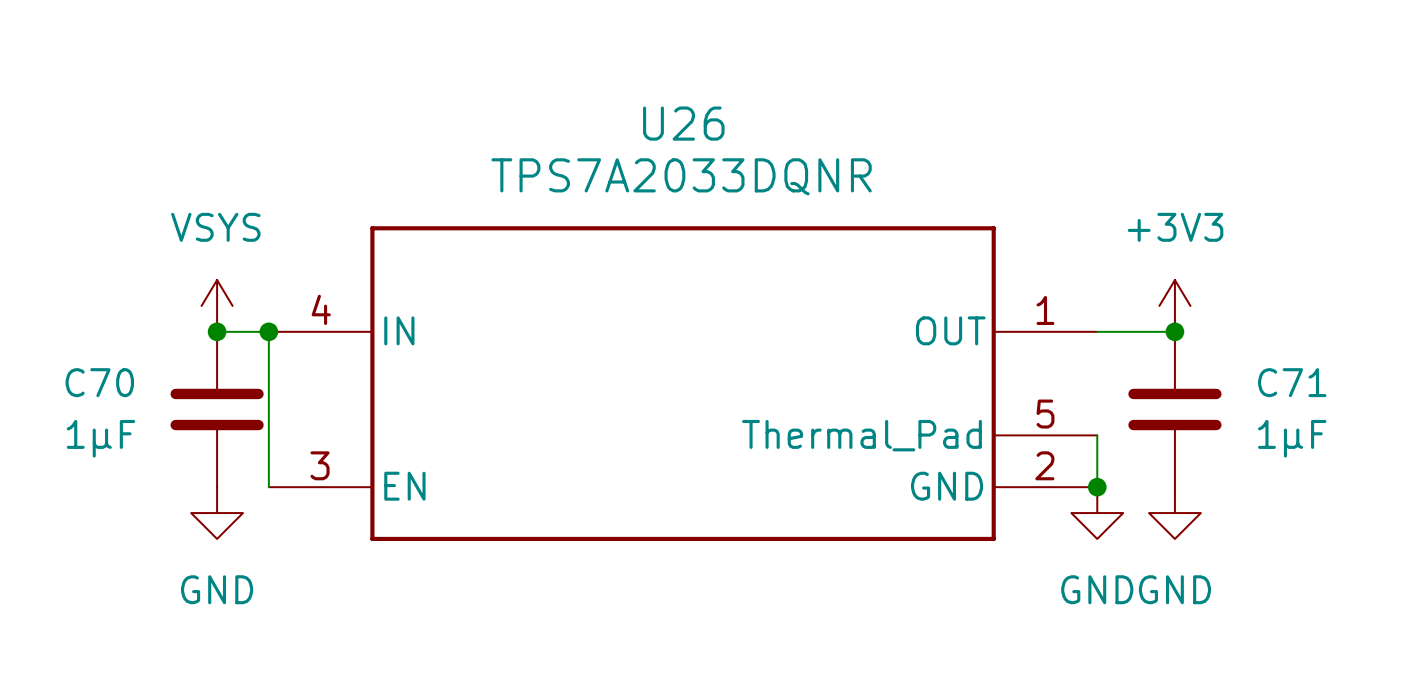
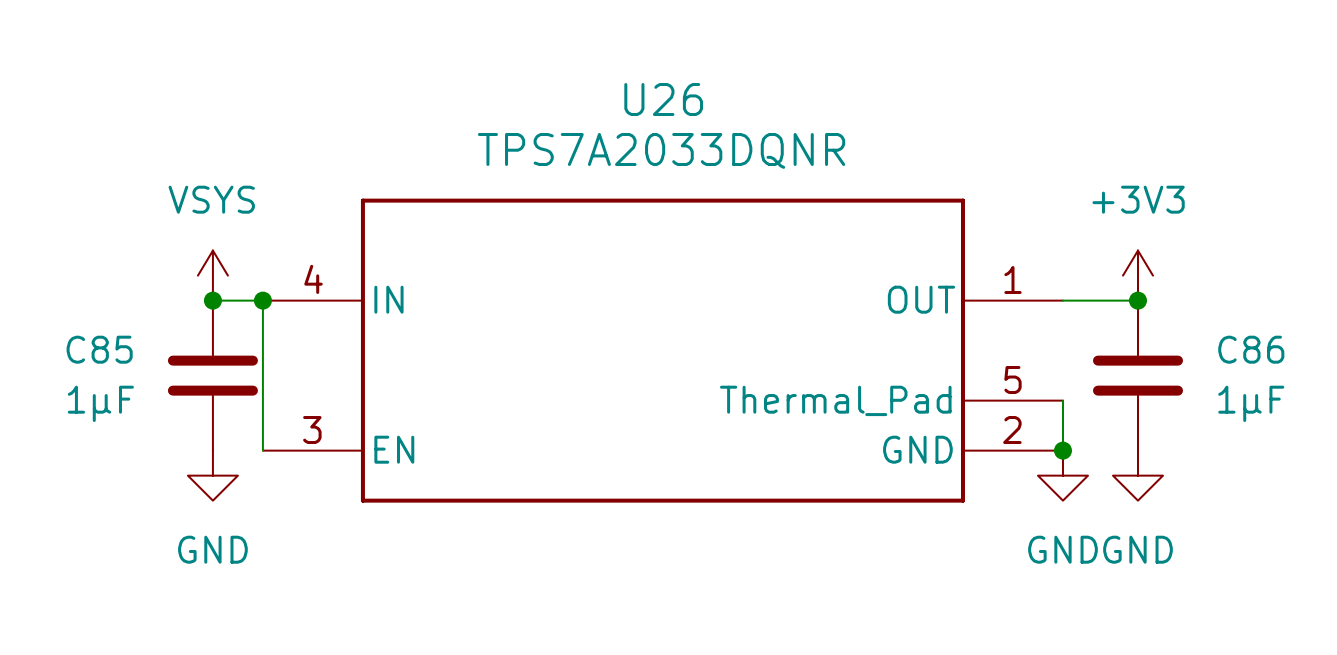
C70 name: C70 (99, 382) -> C85 (99, 349)
C71 name: C71 (1292, 382) -> C86 (1251, 349)

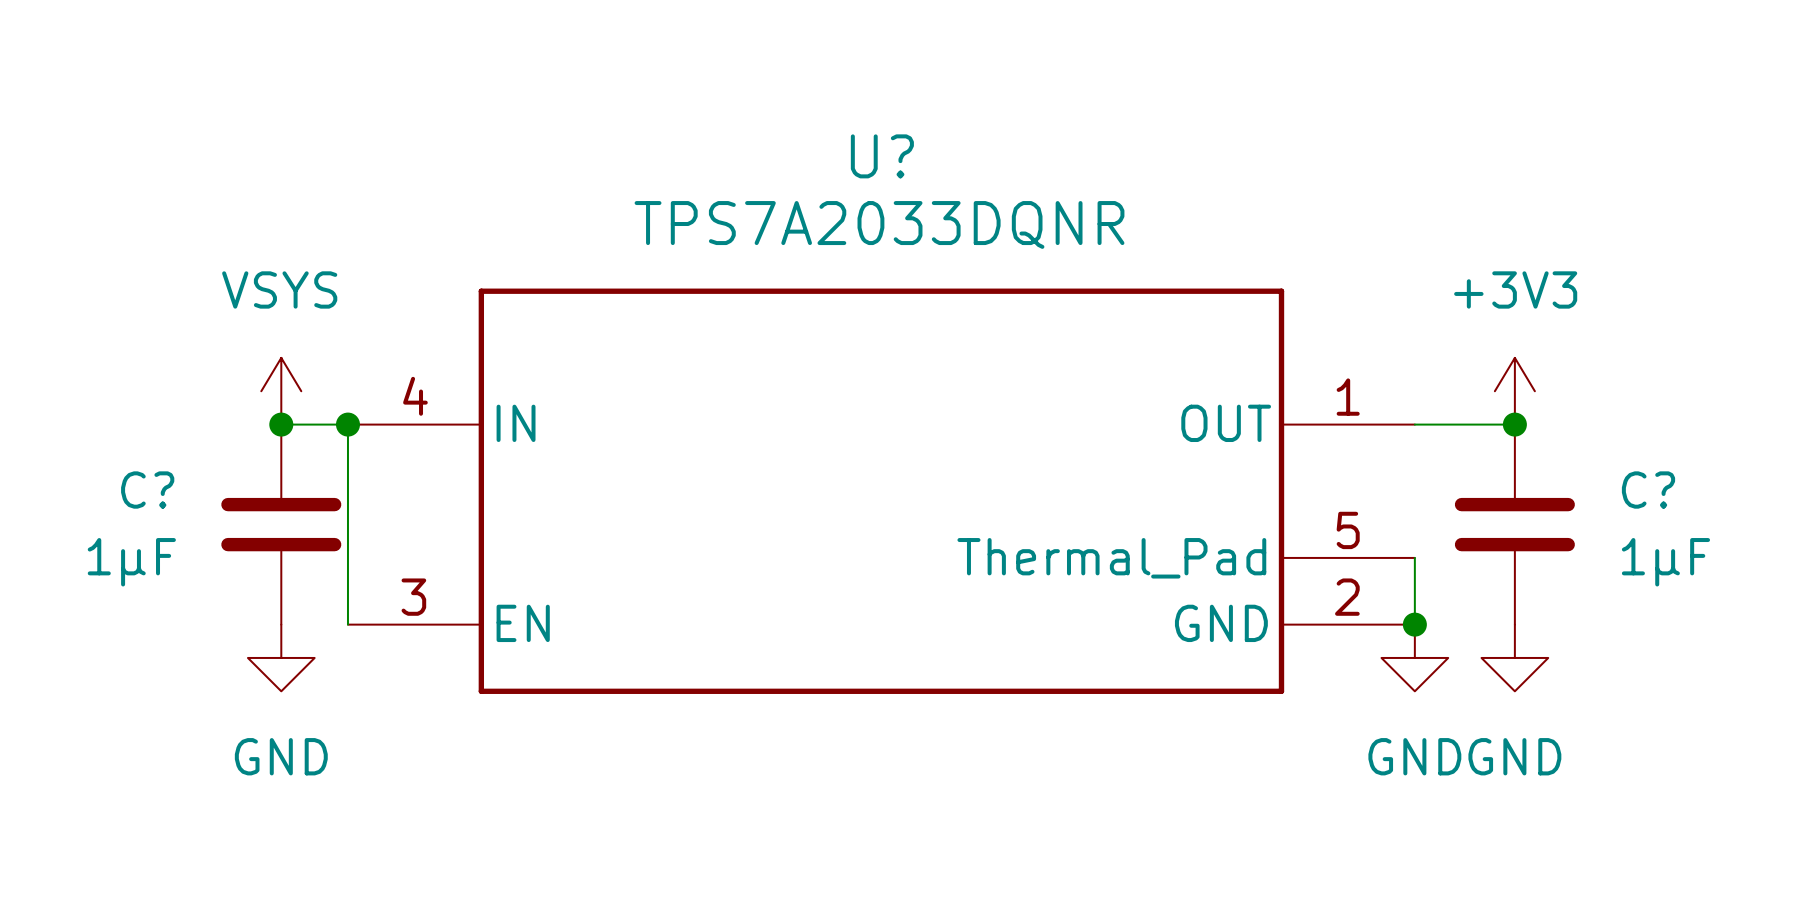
U26 name: U26 (663, 99) -> U? (882, 156)
C85 name: C85 (99, 349) -> C? (147, 490)
C86 name: C86 (1251, 349) -> C? (1648, 490)

